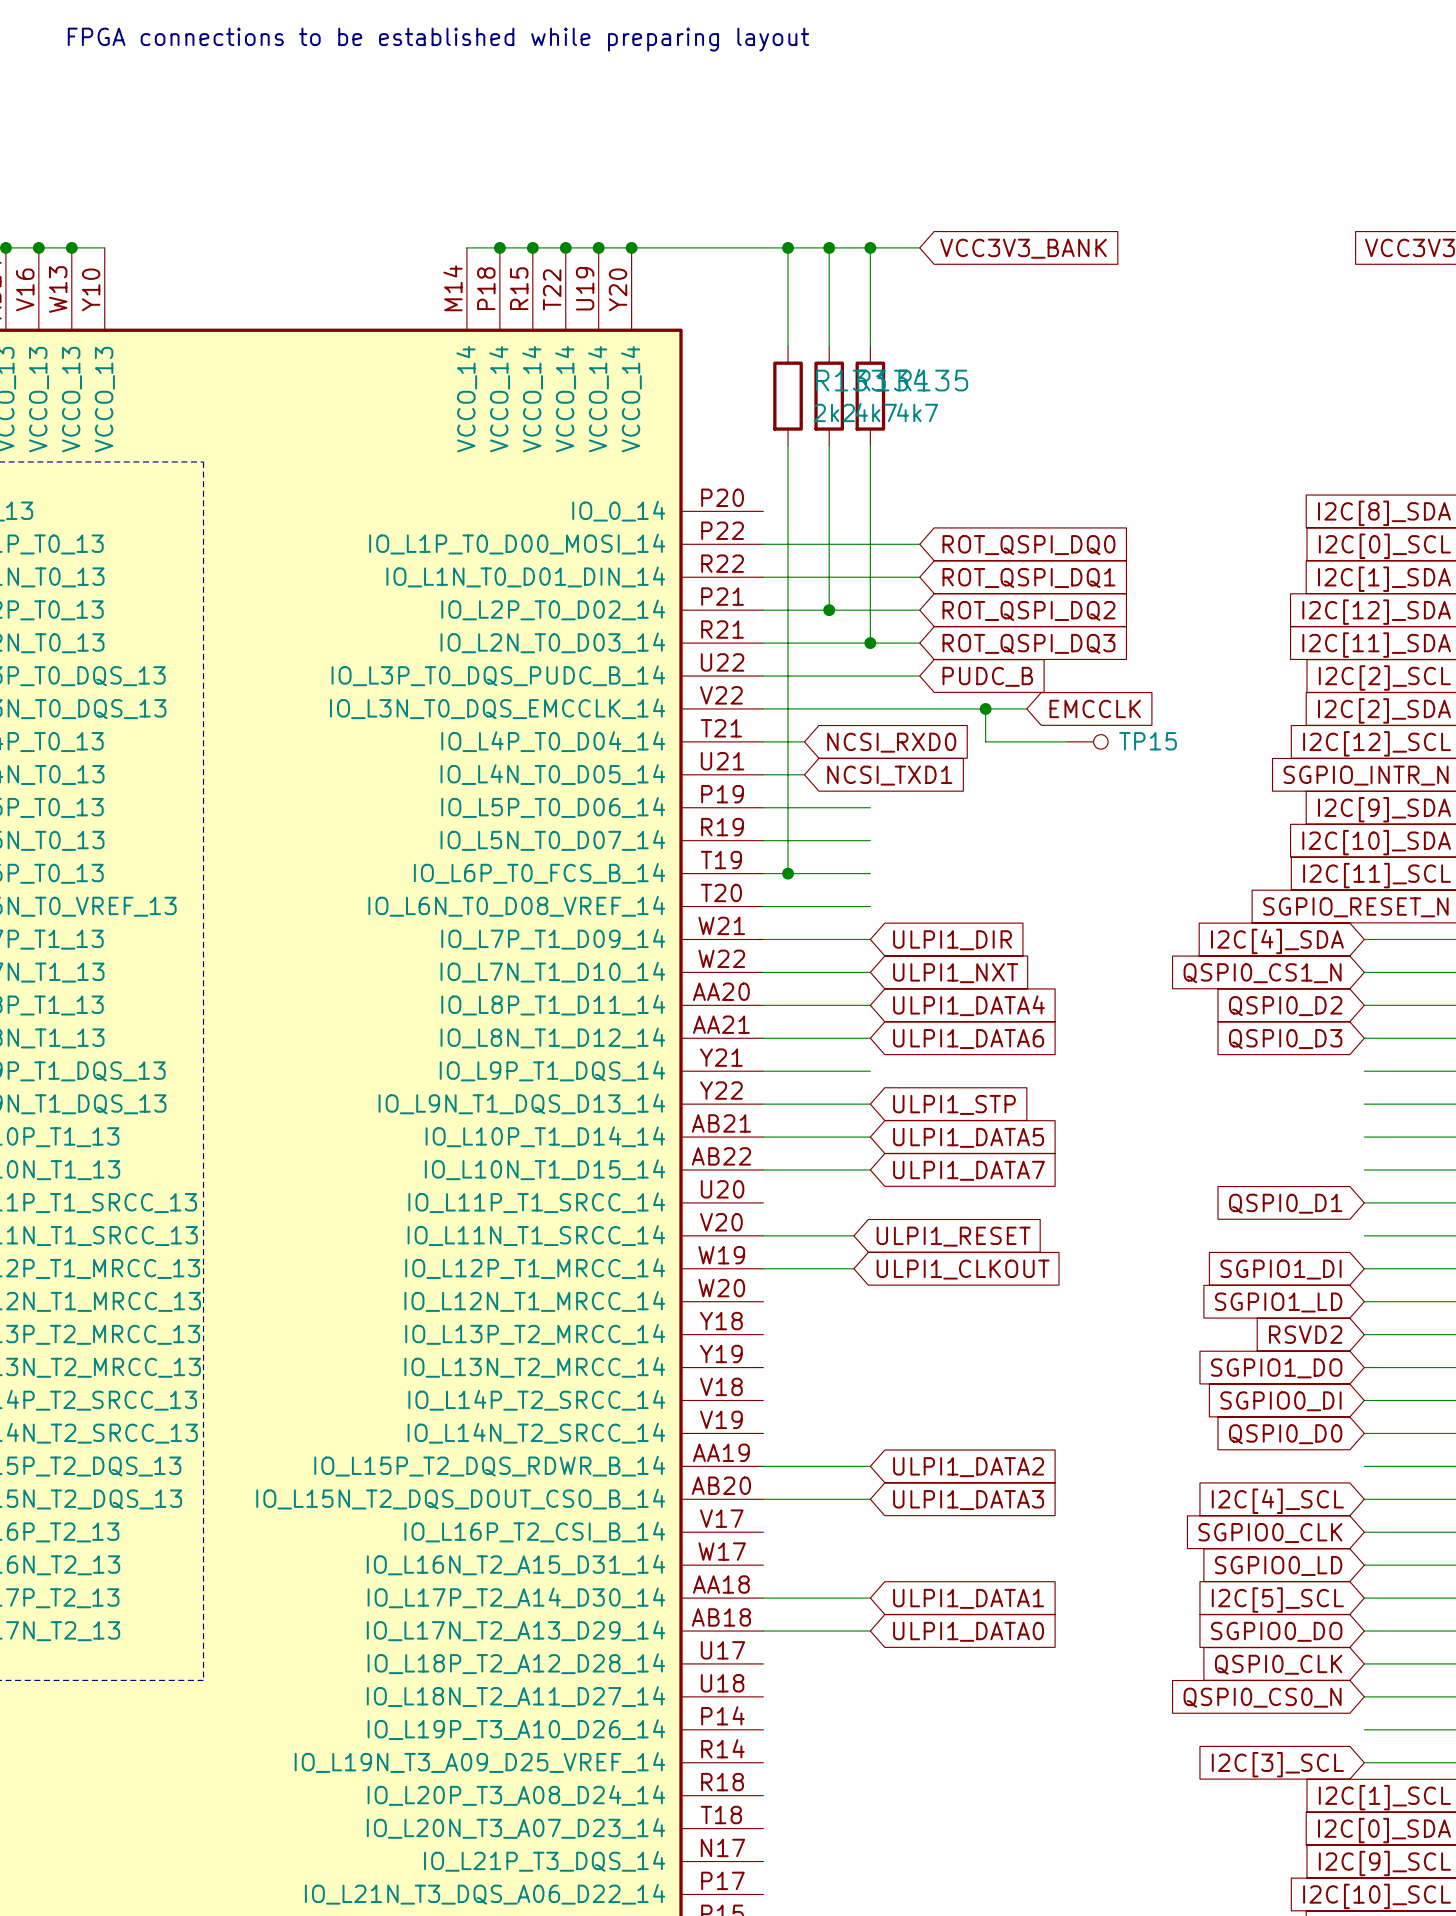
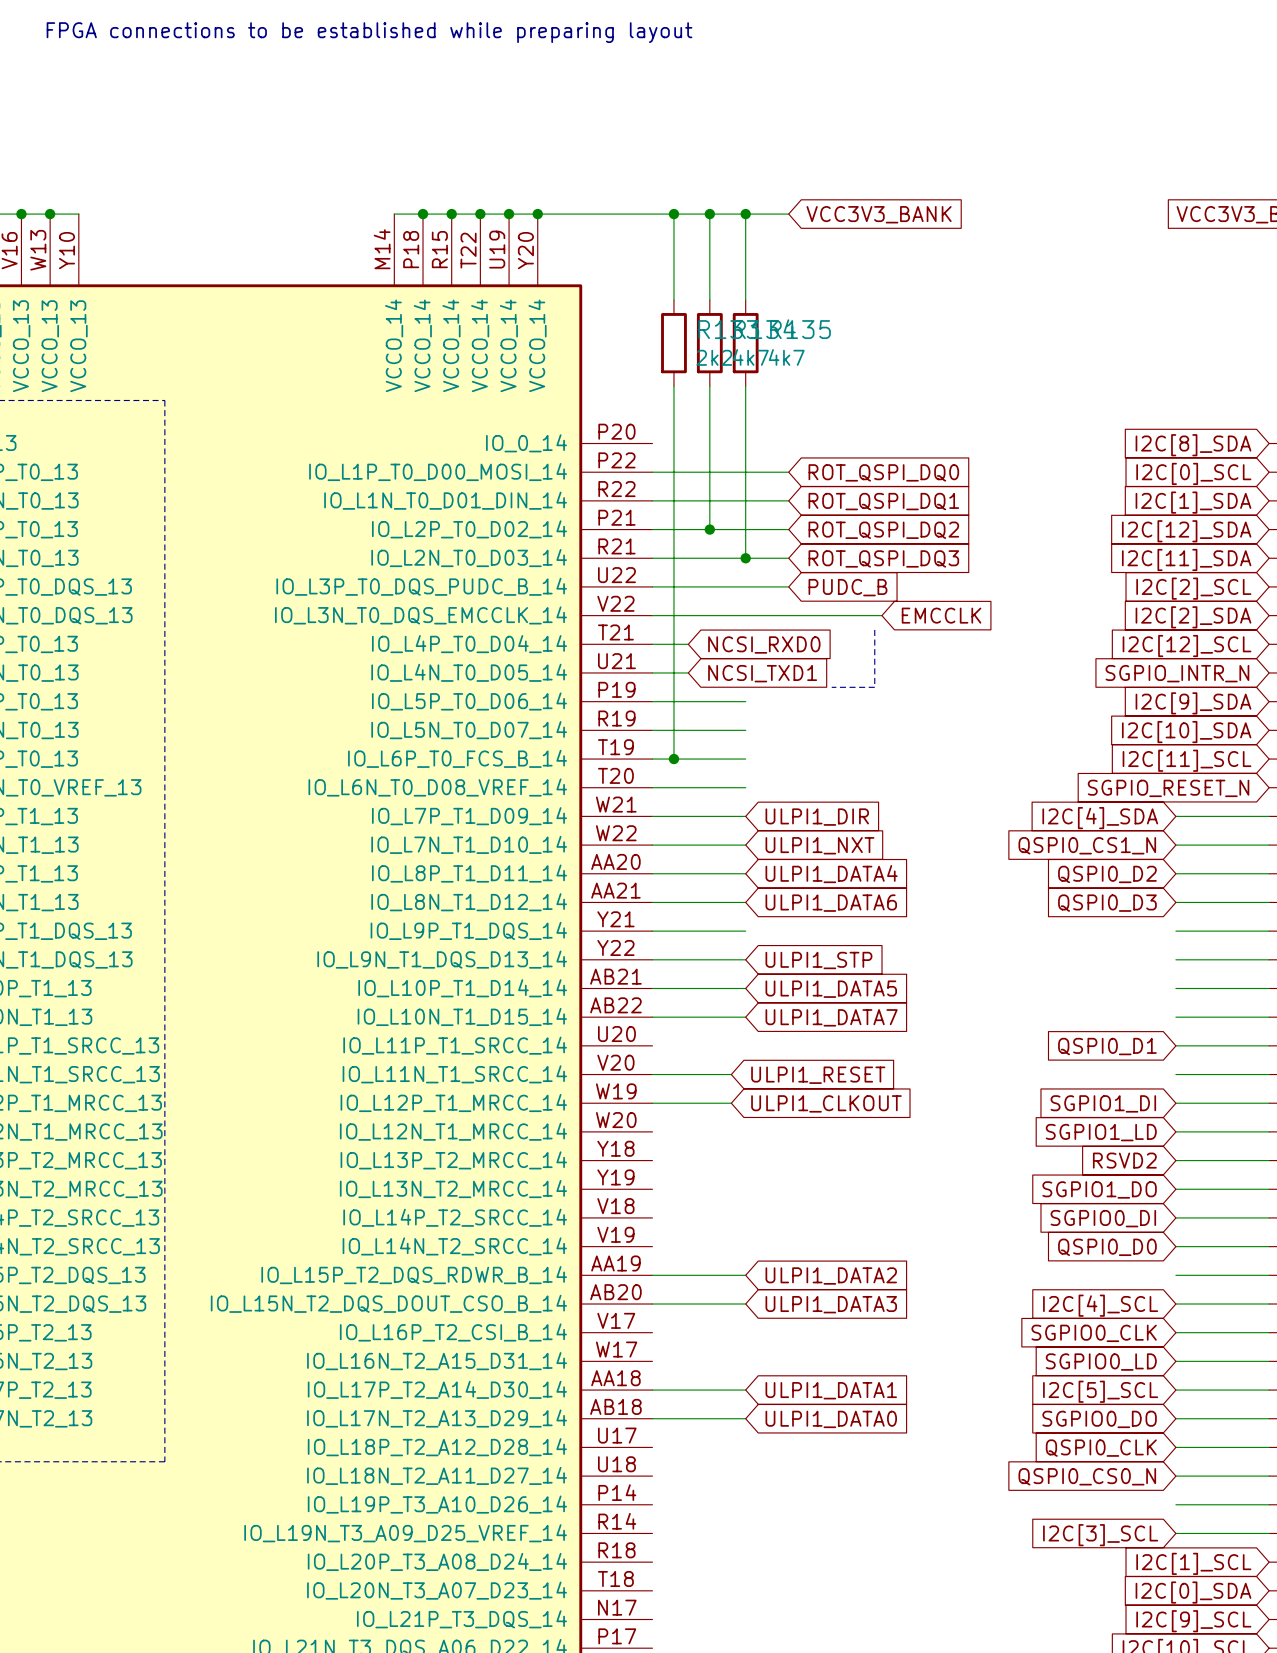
wire: (985, 708) (985, 741) (1067, 741) -> none
junction: (985, 708) -> none
line: none -> (874, 629) (874, 687) (831, 687)
TP15: (1088, 741) -> none

